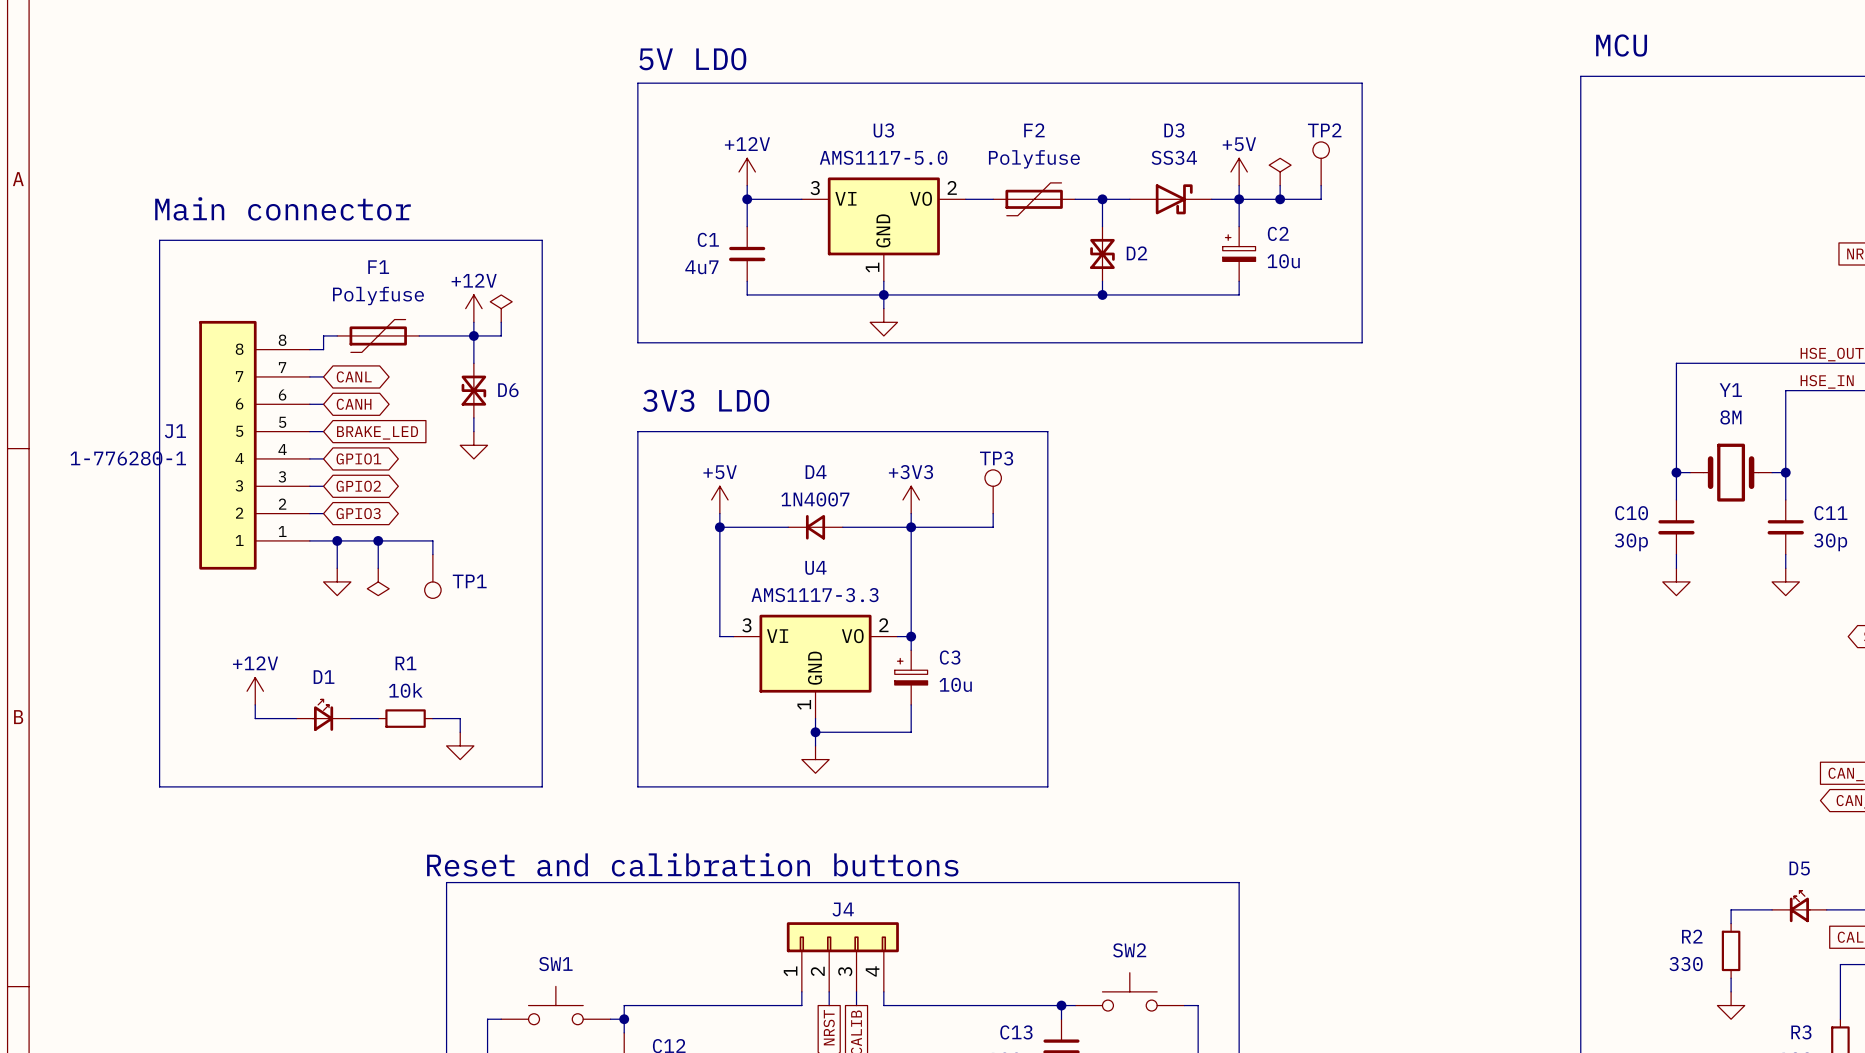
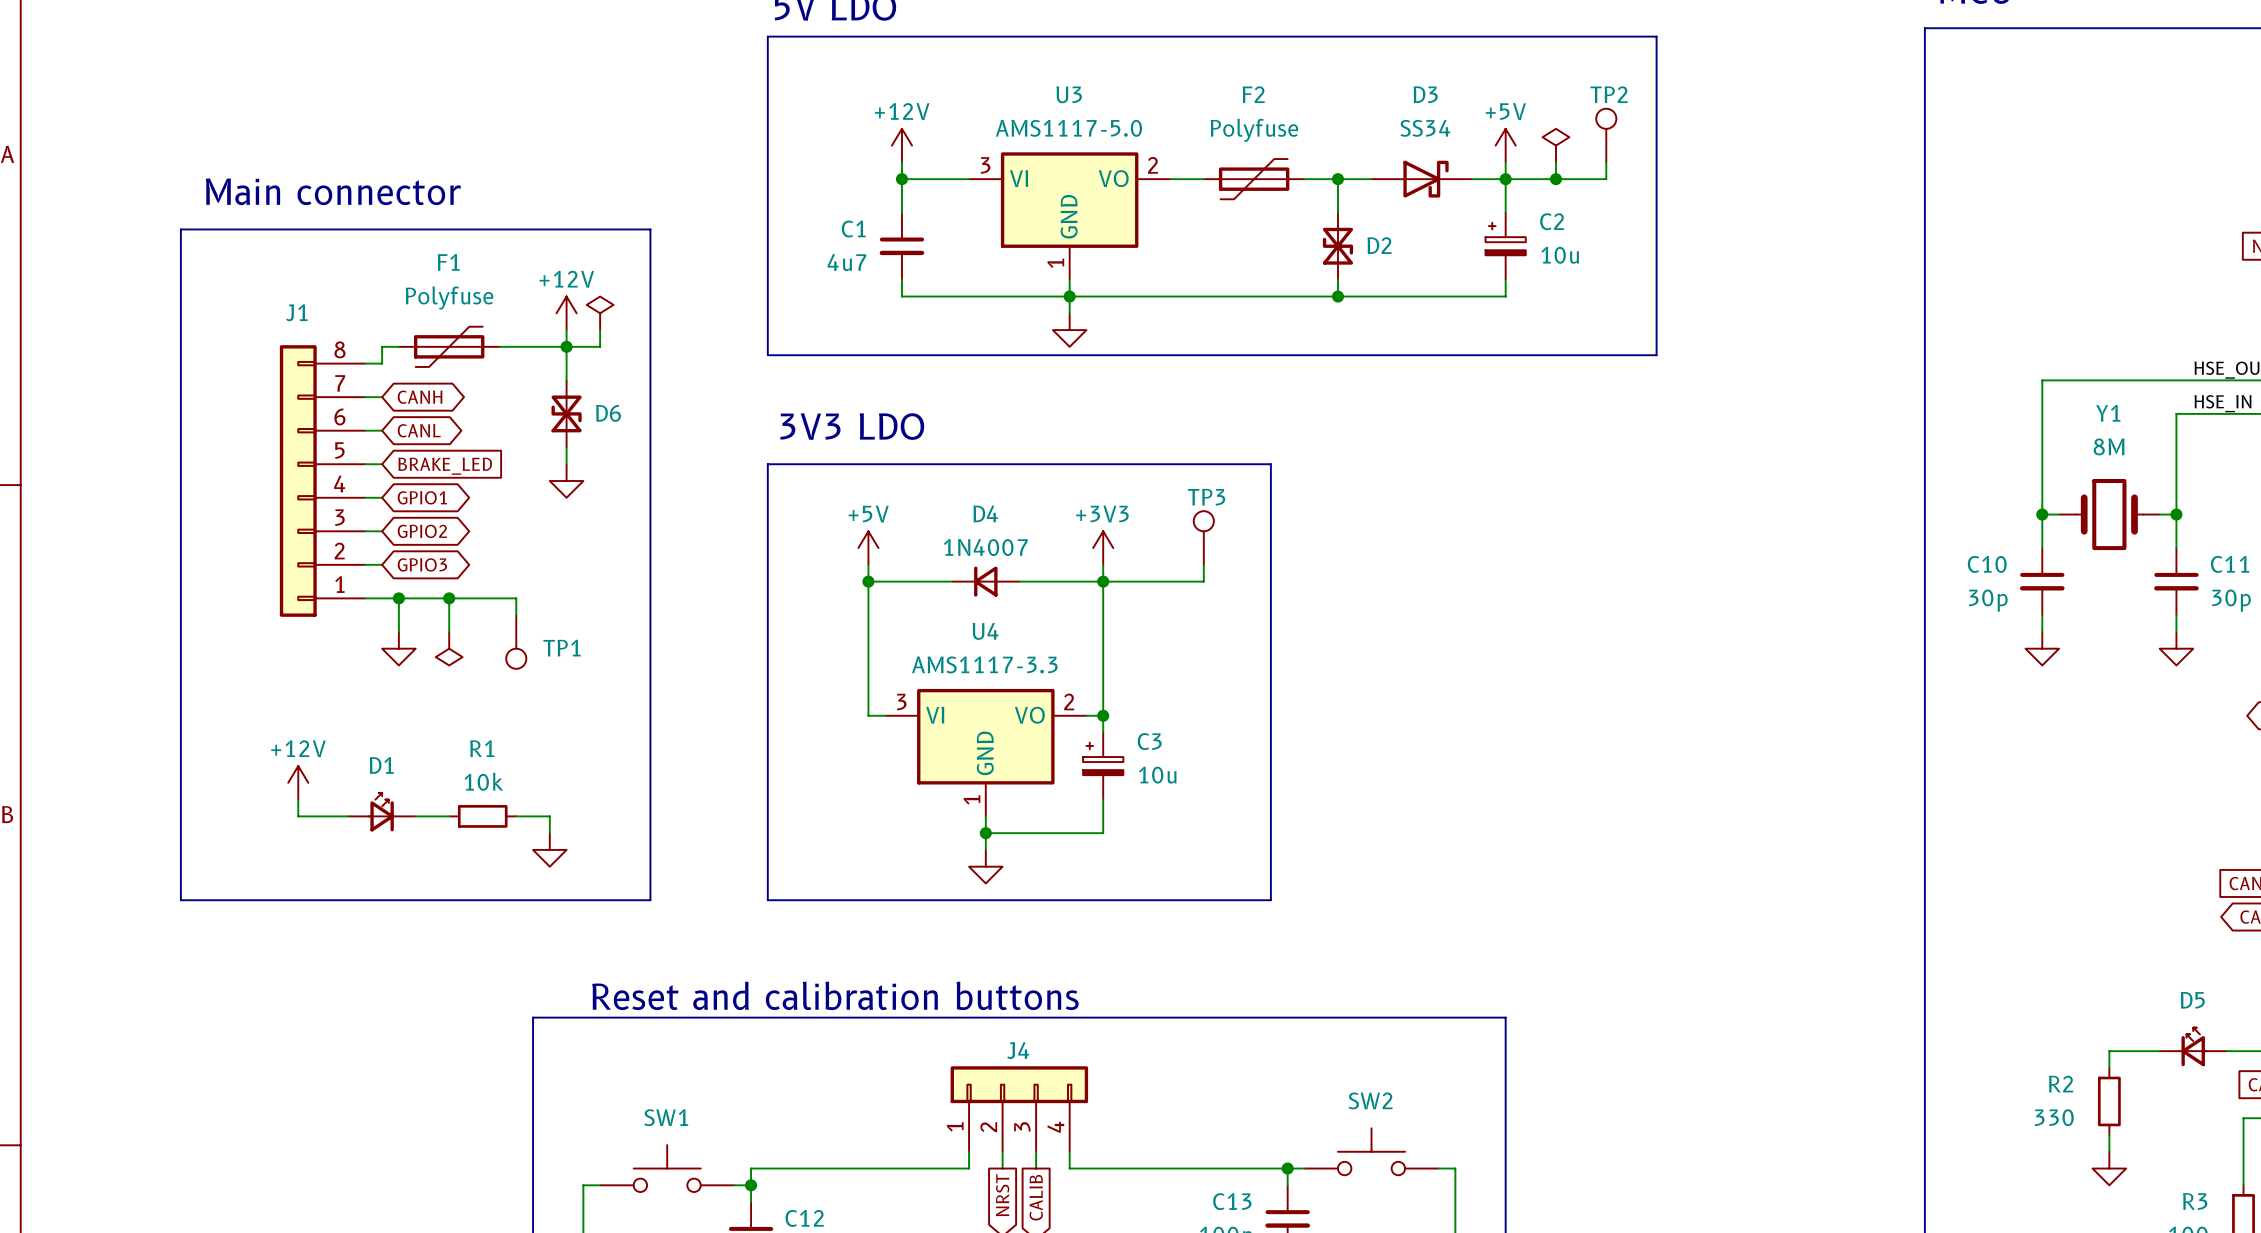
J1 symbol: [199, 320, 310, 570] -> [279, 345, 366, 617]
global label: CANL (354, 376) -> CANH (420, 397)
global label: CANH (354, 404) -> CANL (419, 430)
J1 name position: J1 (175, 431) -> J1 (296, 312)
J1 value: 1-776280-1 (128, 458) -> none

